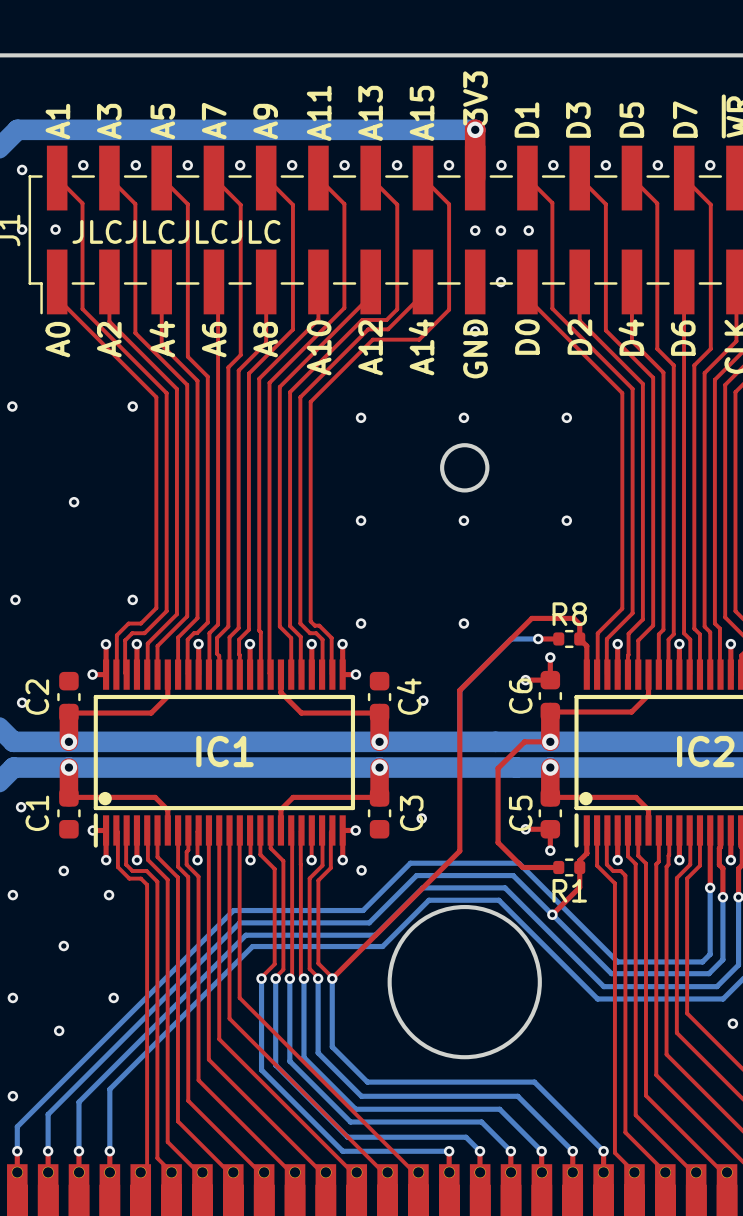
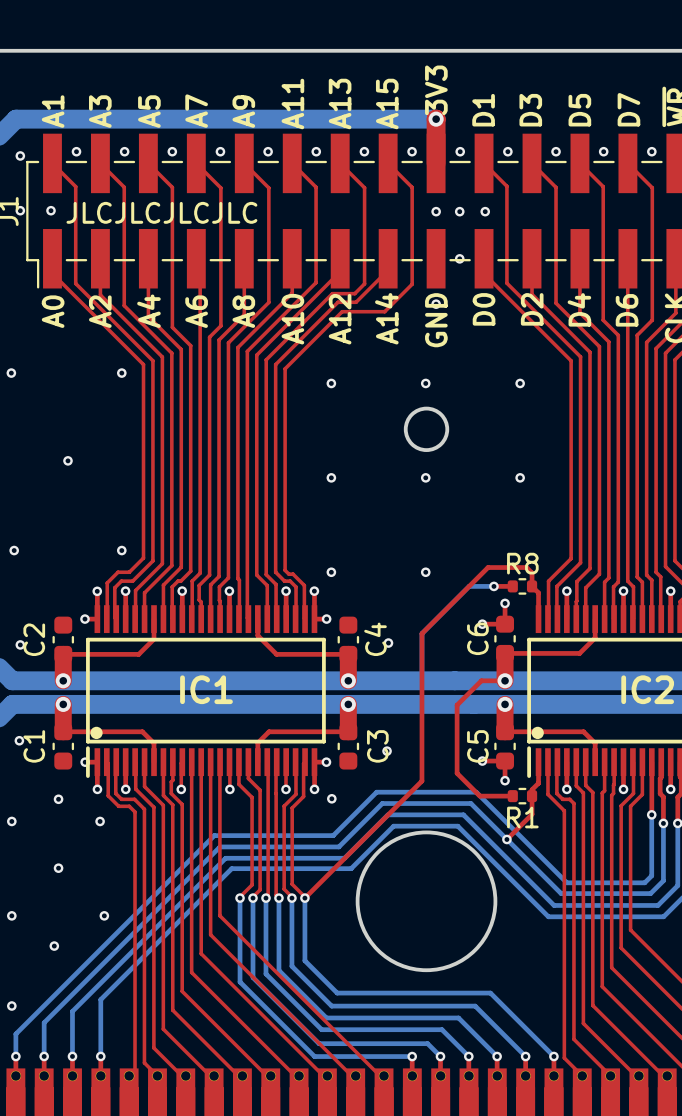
via: (732, 1023) -> none

